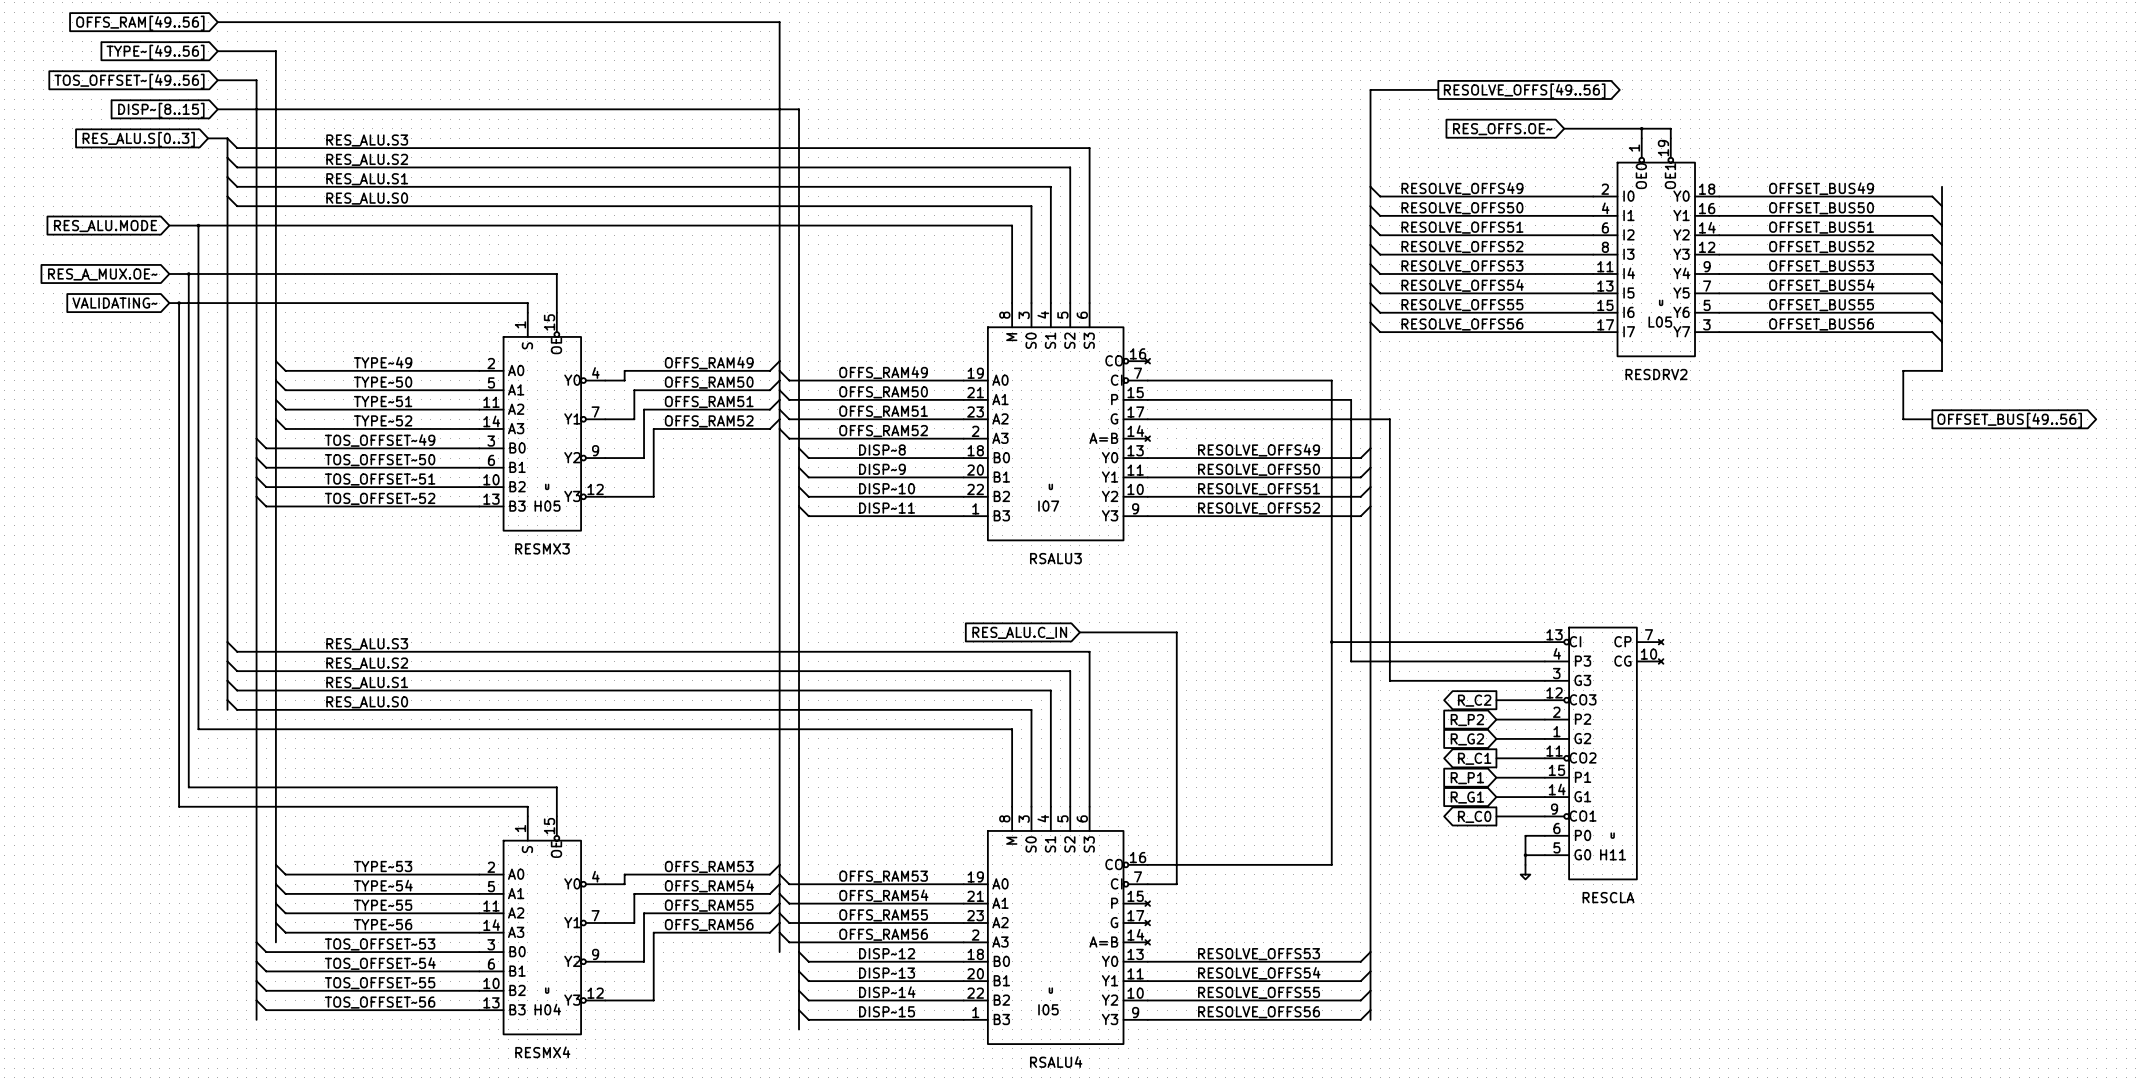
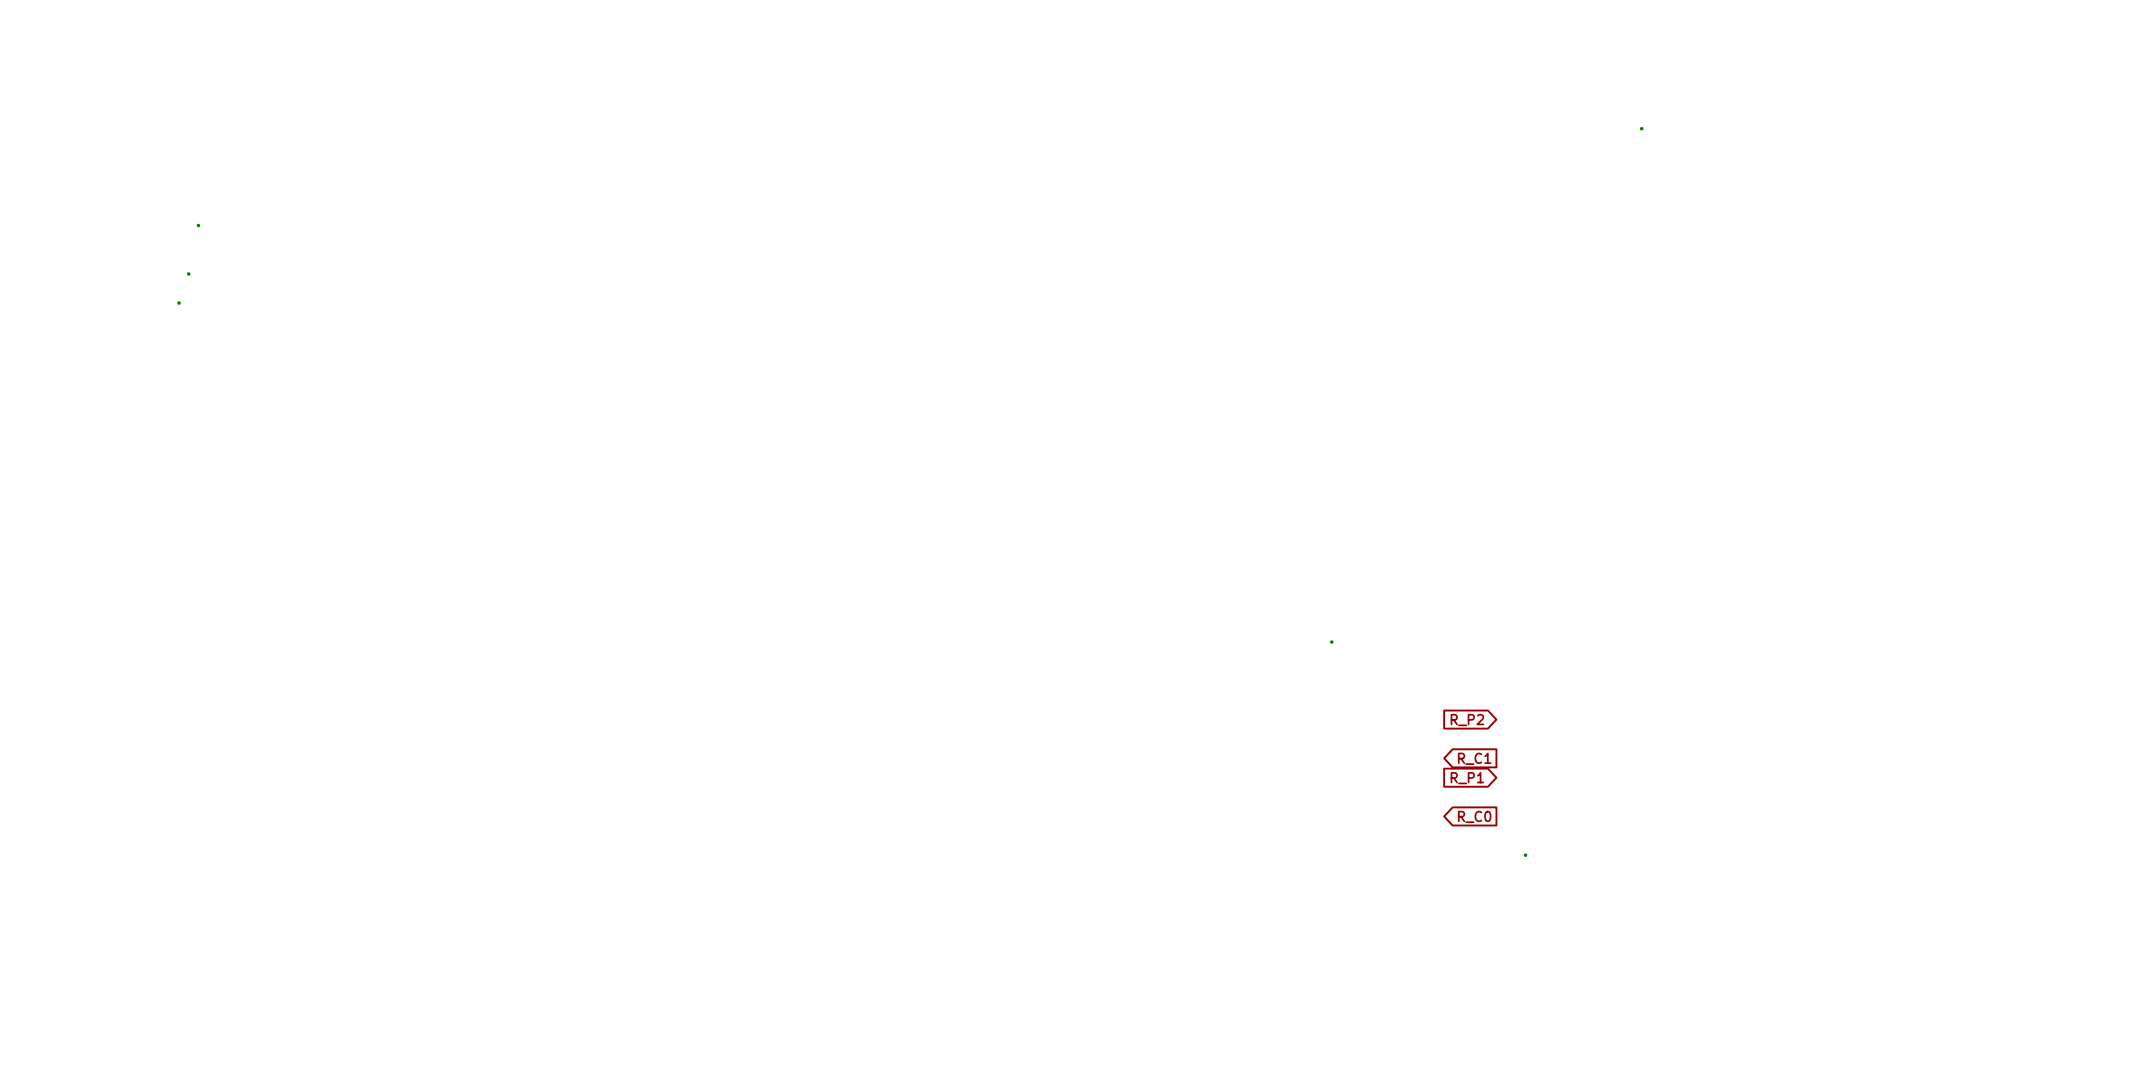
bus: (217, 22) (779, 22) (779, 952) -> none
global label: OFFS_RAM[49..56] (140, 23) -> none
bus: (217, 51) (275, 51) (275, 942) -> none
global label: TYPE~[49..56] (155, 52) -> none
bus: (217, 80) (256, 80) (256, 1019) -> none
global label: TOS_OFFSET~[49..56] (129, 81) -> none
bus: (1438, 89) (1370, 89) (1370, 1019) -> none
global label: RESOLVE_OFFS[49..56] (1524, 91) -> none
bus: (217, 109) (799, 109) (799, 1029) -> none
global label: DISP~[8..15] (161, 110) -> none
wire: (1564, 128) (1670, 128) (1670, 138) -> none
wire: (1641, 128) (1641, 138) -> none
global label: RES_OFFS.OE~ (1502, 129) -> none
bus: (208, 138) (227, 138) (227, 709) -> none
wire: (227, 138) (237, 148) (1089, 148) (1089, 303) -> none
global label: RES_ALU.S[0..3] (138, 139) -> none
label: RES_ALU.S3 (367, 140) -> none
wire: (227, 157) (237, 167) (1070, 167) (1070, 303) -> none
label: RES_ALU.S2 (367, 159) -> none
wire: (227, 177) (237, 186) (1050, 186) (1050, 303) -> none
label: RES_ALU.S1 (367, 179) -> none
wire: (1370, 186) (1380, 196) (1593, 196) -> none
bus: (1942, 186) (1942, 370) (1903, 370) (1903, 419) (1932, 419) -> none
label: RESOLVE_OFFS49 (1462, 188) -> none
label: OFFSET_BUS49 (1821, 188) -> none
wire: (227, 196) (237, 206) (1031, 206) (1031, 303) -> none
wire: (1719, 196) (1932, 196) (1942, 206) -> none
label: RES_ALU.S0 (367, 198) -> none
wire: (1370, 206) (1380, 215) (1593, 215) -> none
label: RESOLVE_OFFS50 (1462, 208) -> none
label: OFFSET_BUS50 (1821, 208) -> none
wire: (1719, 215) (1932, 215) (1942, 225) -> none
wire: (169, 225) (1012, 225) (1012, 303) -> none
wire: (198, 225) (198, 729) (1012, 729) (1012, 806) -> none
wire: (1370, 225) (1380, 235) (1593, 235) -> none
global label: RES_ALU.MODE (105, 226) -> none
label: RESOLVE_OFFS51 (1462, 227) -> none
label: OFFSET_BUS51 (1821, 227) -> none
wire: (1719, 235) (1932, 235) (1942, 244) -> none
wire: (1370, 244) (1380, 254) (1593, 254) -> none
label: RESOLVE_OFFS52 (1462, 247) -> none
part: (1656, 247) -> none
label: OFFSET_BUS52 (1821, 247) -> none
wire: (1719, 254) (1932, 254) (1942, 264) -> none
wire: (1370, 264) (1380, 274) (1593, 274) -> none
label: RESOLVE_OFFS53 (1462, 266) -> none
label: OFFSET_BUS53 (1821, 266) -> none
global label: RES_A_MUX.OE~ (102, 274) -> none
wire: (169, 274) (556, 274) (556, 312) -> none
wire: (188, 274) (188, 787) (556, 787) (556, 816) -> none
wire: (1719, 274) (1932, 274) (1942, 283) -> none
wire: (1370, 283) (1380, 293) (1593, 293) -> none
label: RESOLVE_OFFS54 (1462, 285) -> none
label: OFFSET_BUS54 (1821, 285) -> none
wire: (1719, 293) (1932, 293) (1942, 303) -> none
global label: VALIDATING~ (114, 303) -> none
wire: (169, 303) (527, 303) (527, 312) -> none
wire: (179, 303) (179, 806) (527, 806) (527, 816) -> none
wire: (1370, 303) (1380, 312) (1593, 312) -> none
label: RESOLVE_OFFS55 (1462, 305) -> none
label: OFFSET_BUS55 (1821, 305) -> none
wire: (1719, 312) (1932, 312) (1942, 322) -> none
wire: (1370, 322) (1380, 332) (1593, 332) -> none
label: RESOLVE_OFFS56 (1462, 324) -> none
label: OFFSET_BUS56 (1821, 324) -> none
wire: (1719, 332) (1932, 332) (1942, 341) -> none
wire: (275, 361) (285, 370) (479, 370) -> none
wire: (779, 361) (769, 370) (624, 370) (624, 380) (605, 380) -> none
no-connect mark: (1147, 361) -> none
label: TYPE~49 (383, 362) -> none
label: OFFS_RAM49 (709, 363) -> none
wire: (779, 370) (789, 380) (963, 380) -> none
label: OFFS_RAM49 (883, 372) -> none
wire: (275, 380) (285, 390) (479, 390) -> none
wire: (779, 380) (769, 390) (634, 390) (634, 419) (605, 419) -> none
wire: (1147, 380) (1331, 380) (1331, 864) (1147, 864) -> none
label: TYPE~50 (383, 382) -> none
label: OFFS_RAM50 (709, 382) -> none
wire: (779, 390) (789, 399) (963, 399) -> none
label: OFFS_RAM50 (883, 392) -> none
wire: (275, 399) (285, 409) (479, 409) -> none
wire: (779, 399) (769, 409) (644, 409) (644, 458) (605, 458) -> none
wire: (1147, 399) (1351, 399) (1351, 661) (1544, 661) -> none
label: TYPE~51 (383, 401) -> none
label: OFFS_RAM51 (709, 402) -> none
wire: (779, 409) (789, 419) (963, 419) -> none
label: OFFS_RAM51 (883, 411) -> none
wire: (275, 419) (285, 428) (479, 428) -> none
wire: (779, 419) (769, 428) (653, 428) (653, 496) (605, 496) -> none
wire: (1147, 419) (1389, 419) (1389, 680) (1544, 680) -> none
label: TYPE~52 (383, 420) -> none
global label: OFFSET_BUS[49..56] (2009, 420) -> none
part: (542, 421) -> none
label: OFFS_RAM52 (709, 421) -> none
part: (1055, 421) -> none
wire: (779, 428) (789, 438) (963, 438) -> none
label: OFFS_RAM52 (883, 431) -> none
wire: (256, 438) (266, 448) (479, 448) -> none
no-connect mark: (1147, 438) -> none
label: TOS_OFFSET~49 (380, 440) -> none
wire: (799, 448) (808, 458) (963, 458) -> none
wire: (1370, 448) (1360, 458) (1147, 458) -> none
label: DISP~8 (882, 449) -> none
label: RESOLVE_OFFS49 (1259, 450) -> none
wire: (256, 458) (266, 467) (479, 467) -> none
label: TOS_OFFSET~50 (380, 460) -> none
wire: (799, 467) (808, 477) (963, 477) -> none
wire: (1370, 467) (1360, 477) (1147, 477) -> none
label: DISP~9 (882, 469) -> none
label: RESOLVE_OFFS50 (1259, 469) -> none
wire: (256, 477) (266, 487) (479, 487) -> none
label: TOS_OFFSET~51 (380, 479) -> none
wire: (799, 487) (808, 496) (963, 496) -> none
wire: (1370, 487) (1360, 496) (1147, 496) -> none
label: DISP~10 (887, 488) -> none
label: RESOLVE_OFFS51 (1259, 489) -> none
wire: (256, 496) (266, 506) (479, 506) -> none
label: TOS_OFFSET~52 (380, 498) -> none
wire: (799, 506) (808, 516) (963, 516) -> none
wire: (1370, 506) (1360, 516) (1147, 516) -> none
label: DISP~11 (887, 508) -> none
label: RESOLVE_OFFS52 (1259, 508) -> none
global label: RES_ALU.C_IN (1019, 632) -> none
wire: (1079, 632) (1176, 632) (1176, 884) (1147, 884) -> none
wire: (227, 642) (237, 651) (1089, 651) (1089, 806) -> none
wire: (1331, 642) (1544, 642) -> none
no-connect mark: (1661, 642) -> none
label: RES_ALU.S3 (367, 644) -> none
wire: (227, 661) (237, 671) (1070, 671) (1070, 806) -> none
no-connect mark: (1661, 661) -> none
label: RES_ALU.S2 (367, 663) -> none
wire: (227, 680) (237, 690) (1050, 690) (1050, 806) -> none
label: RES_ALU.S1 (367, 682) -> none
wire: (227, 700) (237, 709) (1031, 709) (1031, 806) -> none
global label: R_C2 (1474, 700) -> none
wire: (1496, 700) (1544, 700) -> none
label: RES_ALU.S0 (367, 702) -> none
wire: (1496, 719) (1544, 719) -> none
wire: (1496, 738) (1544, 738) -> none
global label: R_G2 (1467, 739) -> none
part: (1602, 753) -> none
wire: (1496, 758) (1544, 758) -> none
wire: (1496, 777) (1544, 777) -> none
global label: R_G1 (1467, 797) -> none
wire: (1496, 797) (1544, 797) -> none
wire: (1496, 816) (1544, 816) -> none
wire: (1544, 835) (1525, 835) (1525, 864) -> none
wire: (1525, 855) (1544, 855) -> none
wire: (275, 864) (285, 874) (479, 874) -> none
wire: (779, 864) (769, 874) (624, 874) (624, 884) (605, 884) -> none
label: TYPE~53 (383, 866) -> none
label: OFFS_RAM53 (709, 866) -> none
power symbol: (1525, 872) -> none
wire: (779, 874) (789, 884) (963, 884) -> none
label: OFFS_RAM53 (883, 876) -> none
wire: (275, 884) (285, 893) (479, 893) -> none
wire: (779, 884) (769, 893) (634, 893) (634, 922) (605, 922) -> none
label: TYPE~54 (383, 885) -> none
label: OFFS_RAM54 (709, 886) -> none
wire: (779, 893) (789, 903) (963, 903) -> none
label: OFFS_RAM54 (883, 895) -> none
wire: (275, 903) (285, 913) (479, 913) -> none
wire: (779, 903) (769, 913) (644, 913) (644, 961) (605, 961) -> none
no-connect mark: (1147, 903) -> none
label: TYPE~55 (383, 905) -> none
label: OFFS_RAM55 (709, 905) -> none
wire: (779, 913) (789, 922) (963, 922) -> none
label: OFFS_RAM55 (883, 915) -> none
wire: (275, 922) (285, 932) (479, 932) -> none
wire: (779, 922) (769, 932) (653, 932) (653, 1000) (605, 1000) -> none
no-connect mark: (1147, 922) -> none
label: TYPE~56 (383, 924) -> none
part: (542, 925) -> none
label: OFFS_RAM56 (709, 925) -> none
part: (1055, 925) -> none
wire: (779, 932) (789, 942) (963, 942) -> none
label: OFFS_RAM56 (883, 934) -> none
wire: (256, 942) (266, 952) (479, 952) -> none
no-connect mark: (1147, 942) -> none
label: TOS_OFFSET~53 (380, 944) -> none
wire: (799, 952) (808, 961) (963, 961) -> none
wire: (1370, 952) (1360, 961) (1147, 961) -> none
label: DISP~12 (887, 953) -> none
label: RESOLVE_OFFS53 (1259, 954) -> none
wire: (256, 961) (266, 971) (479, 971) -> none
label: TOS_OFFSET~54 (380, 963) -> none
wire: (799, 971) (808, 981) (963, 981) -> none
wire: (1370, 971) (1360, 981) (1147, 981) -> none
label: DISP~13 (887, 973) -> none
label: RESOLVE_OFFS54 (1259, 973) -> none
wire: (256, 981) (266, 990) (479, 990) -> none
label: TOS_OFFSET~55 (380, 983) -> none
wire: (799, 990) (808, 1000) (963, 1000) -> none
wire: (1370, 990) (1360, 1000) (1147, 1000) -> none
label: DISP~14 (887, 992) -> none
label: RESOLVE_OFFS55 (1259, 992) -> none
wire: (256, 1000) (266, 1010) (479, 1010) -> none
label: TOS_OFFSET~56 (380, 1002) -> none
wire: (799, 1010) (808, 1019) (963, 1019) -> none
wire: (1370, 1010) (1360, 1019) (1147, 1019) -> none
label: DISP~15 (887, 1011) -> none
label: RESOLVE_OFFS56 (1259, 1012) -> none

